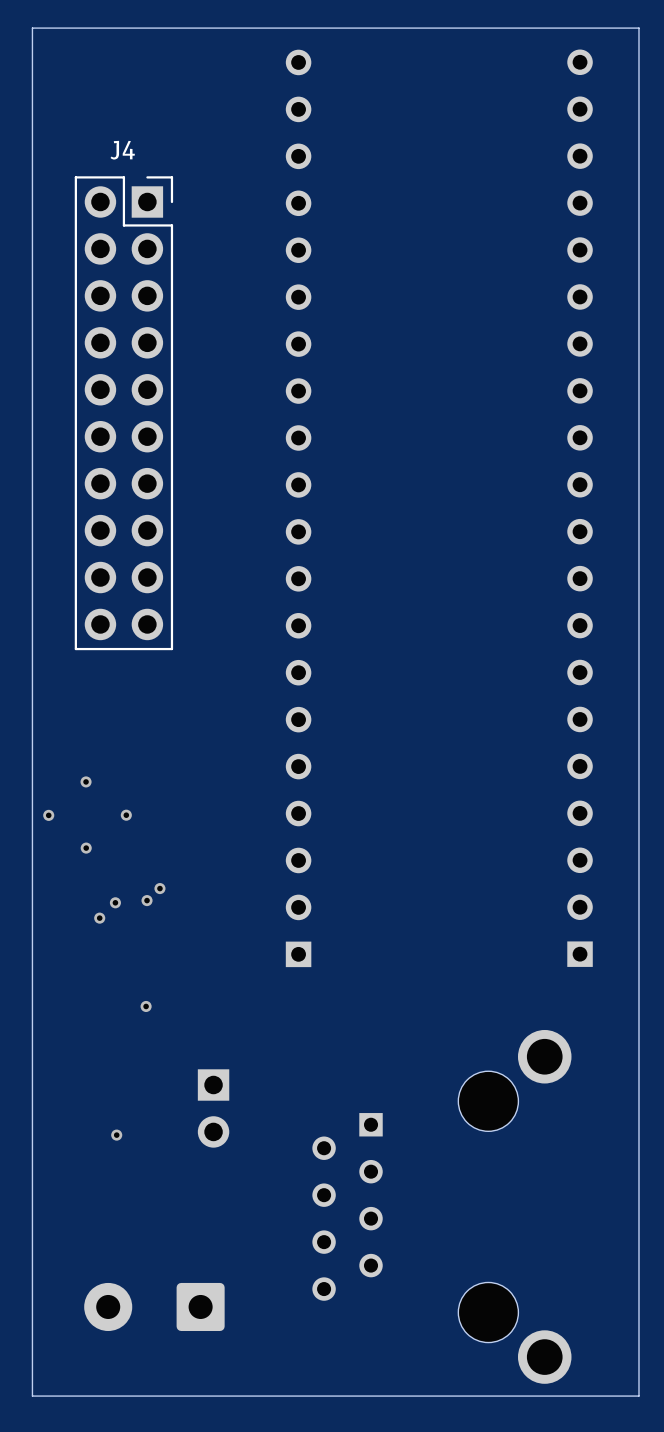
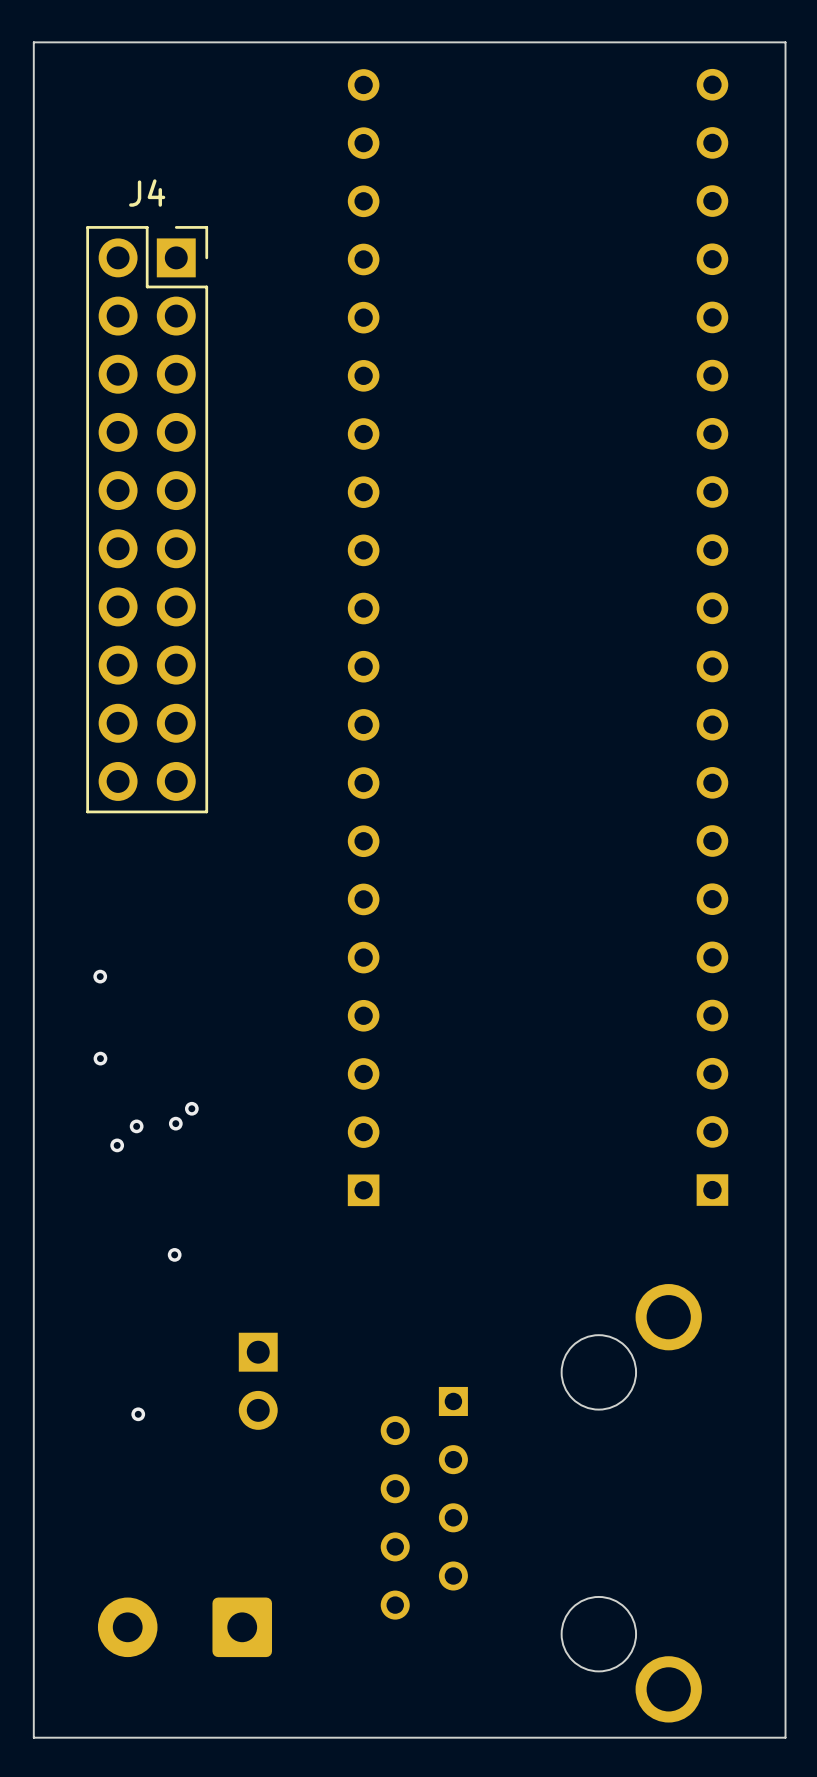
via: (48, 815) -> none
via: (126, 815) -> none

